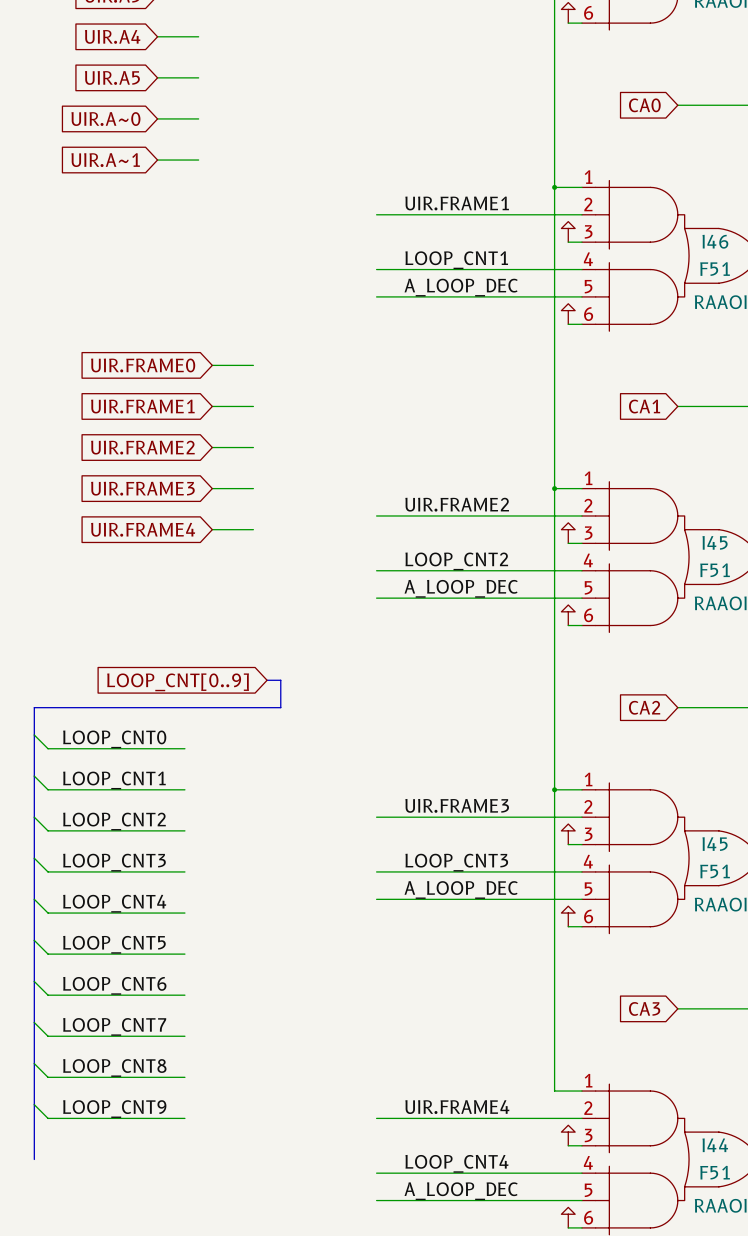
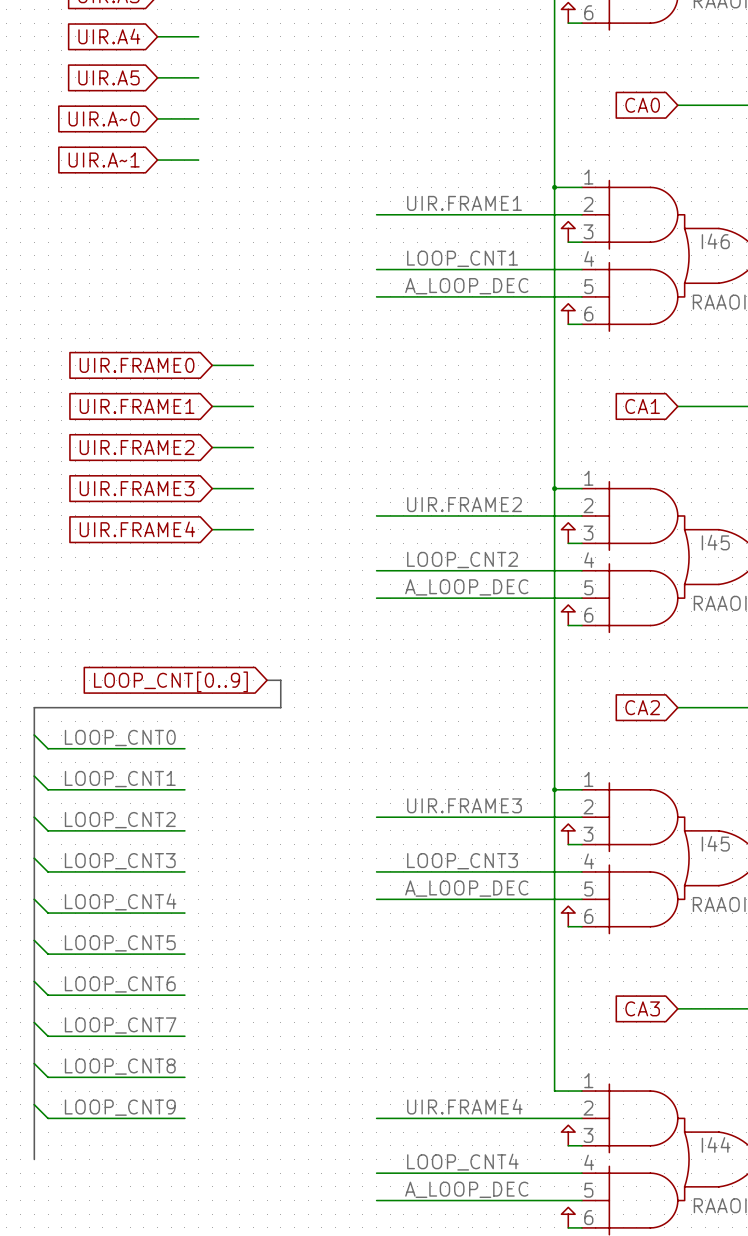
part value: F51 (715, 269) -> none
part value: F51 (715, 570) -> none
part value: F51 (715, 871) -> none
part value: F51 (715, 1172) -> none

